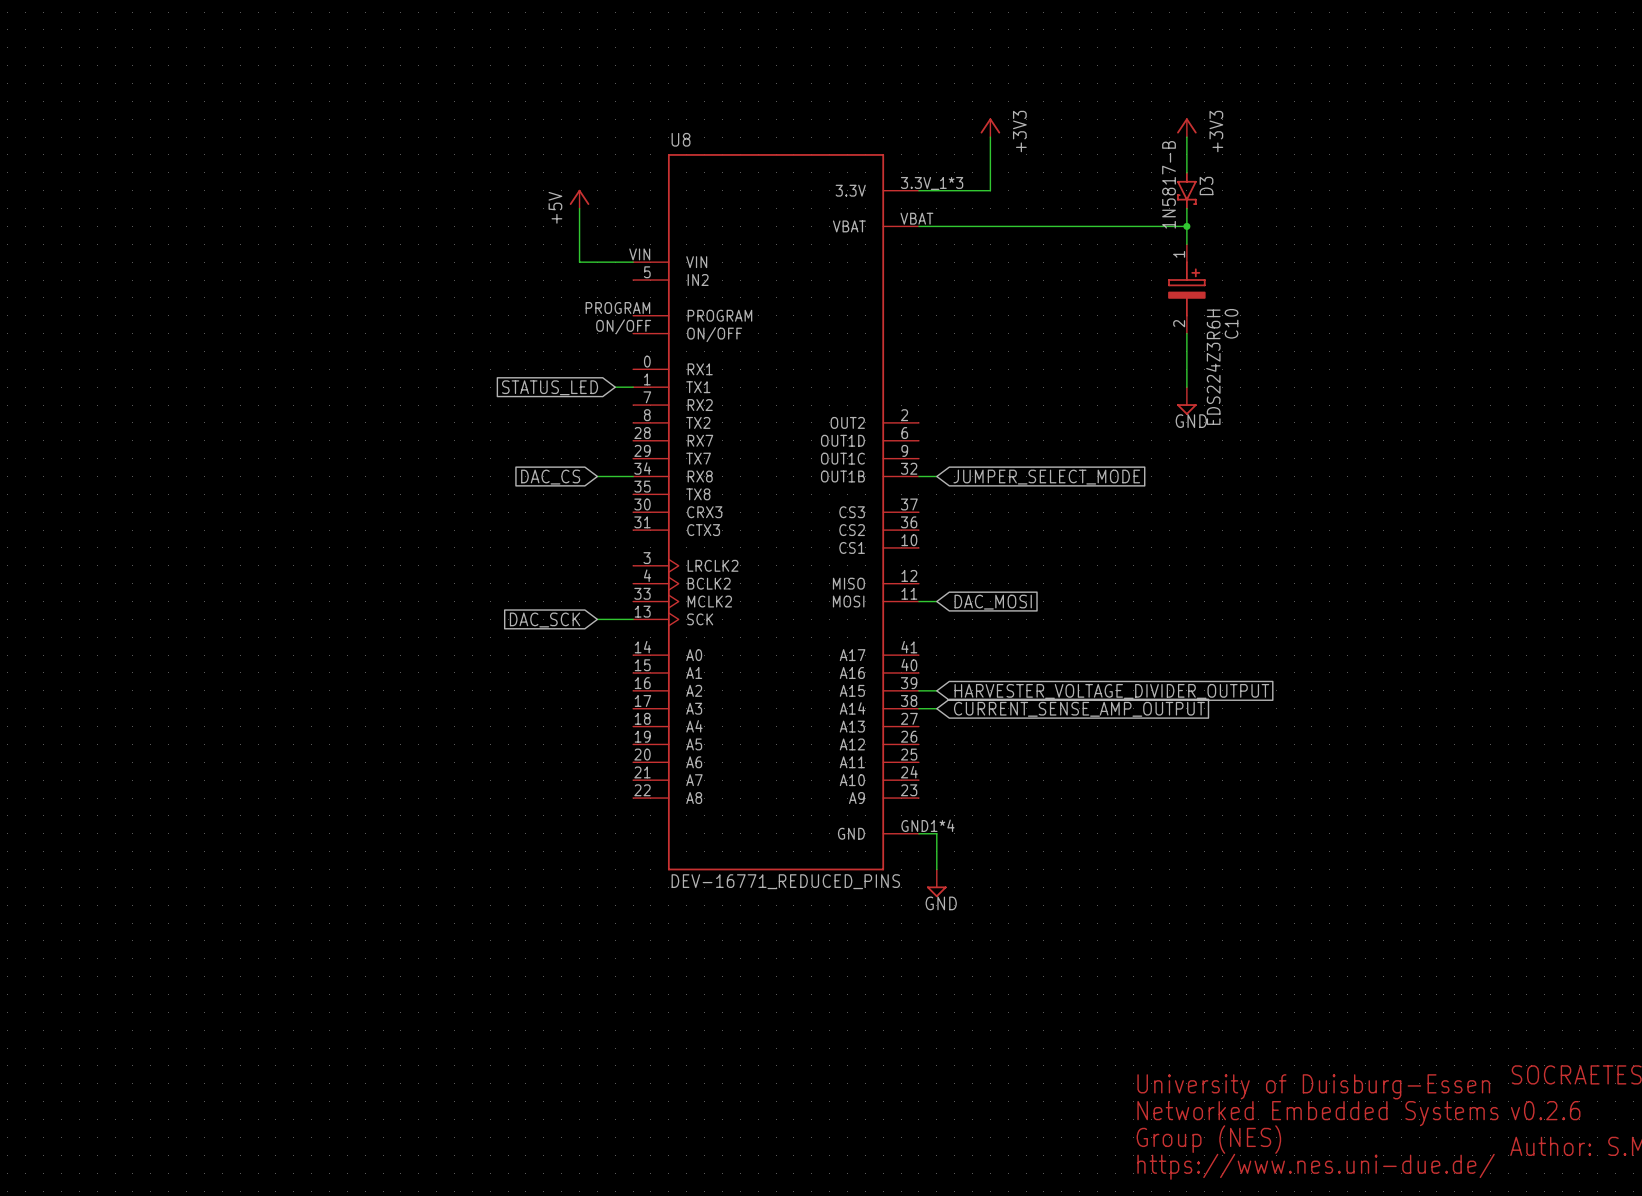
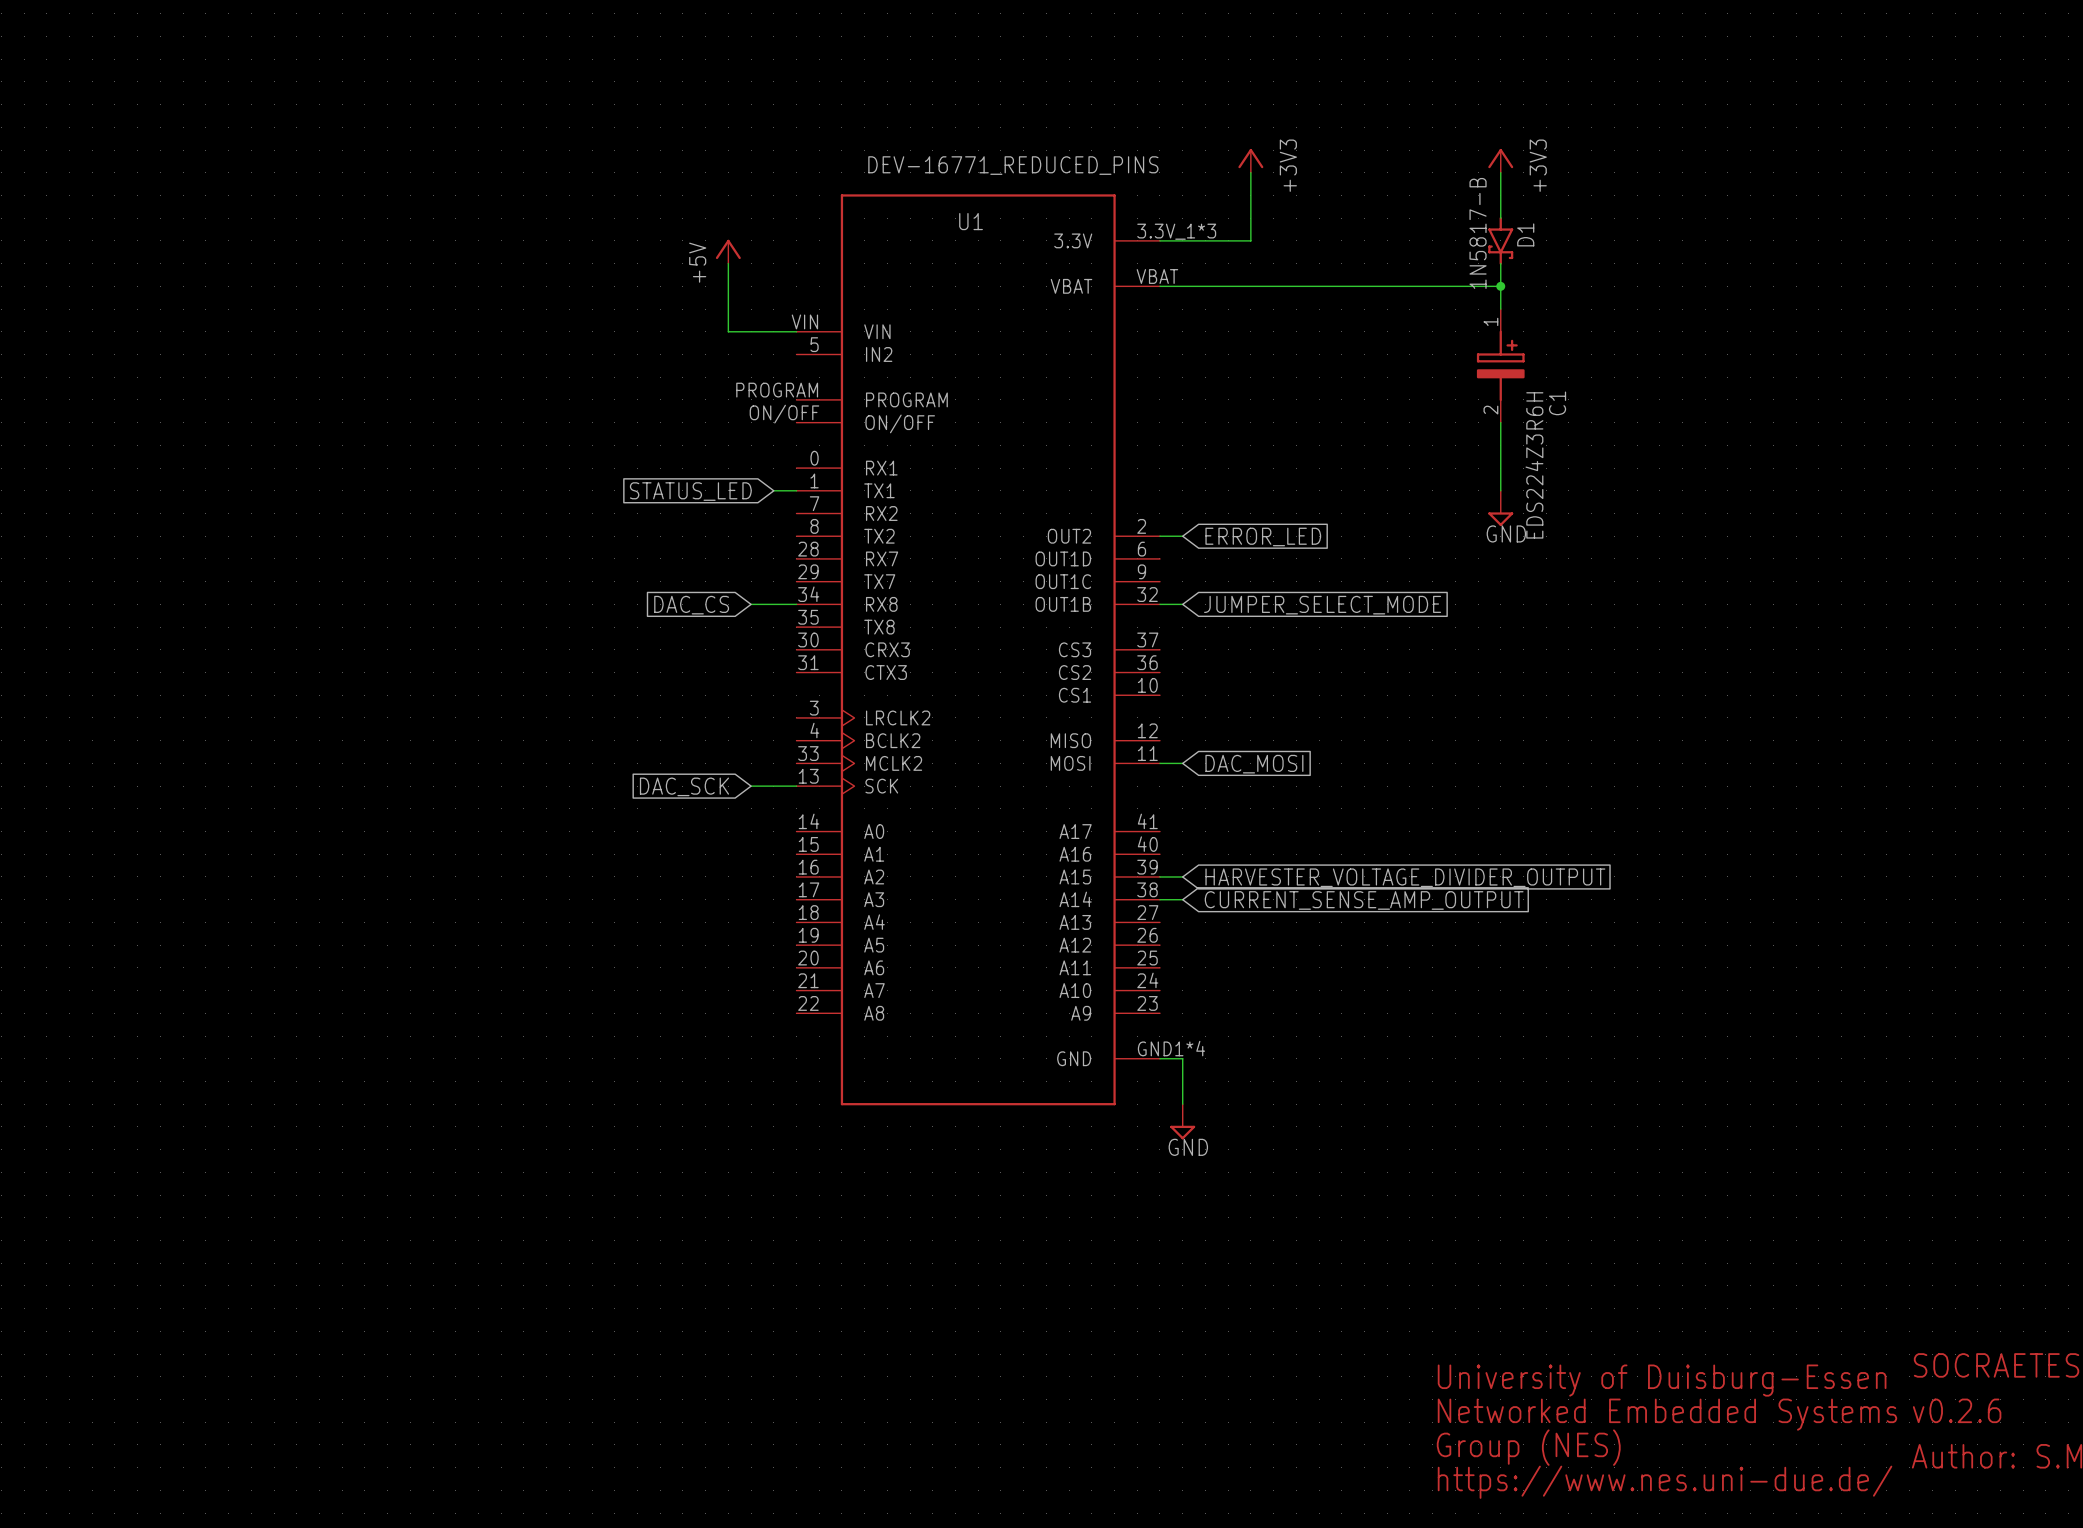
U8 name: U8 (681, 139) -> U1 (971, 221)
D3 name: D3 (1206, 185) -> D1 (1525, 234)
C10 name: C10 (1231, 323) -> C1 (1557, 403)
wire: none -> (1159, 536) (1182, 536)
global label: none -> ERROR_LED (1263, 536)
U8 value position: DEV-16771_REDUCED_PINS (785, 881) -> DEV-16771_REDUCED_PINS (1013, 165)

